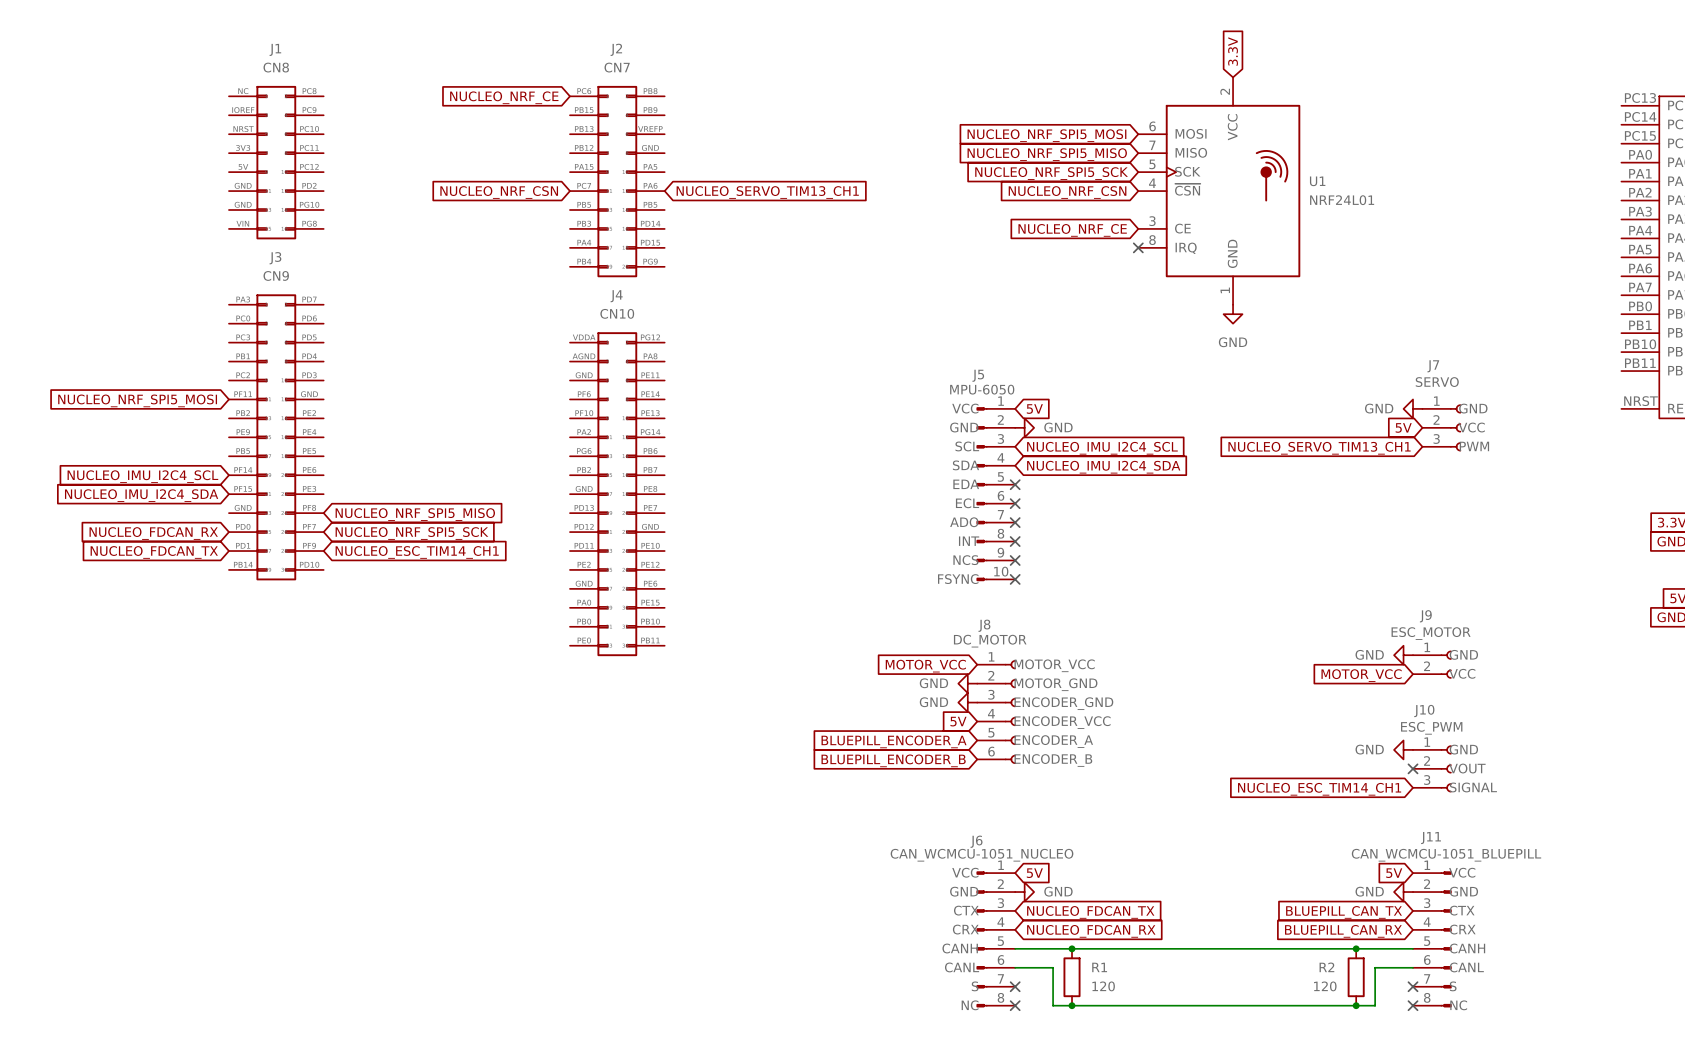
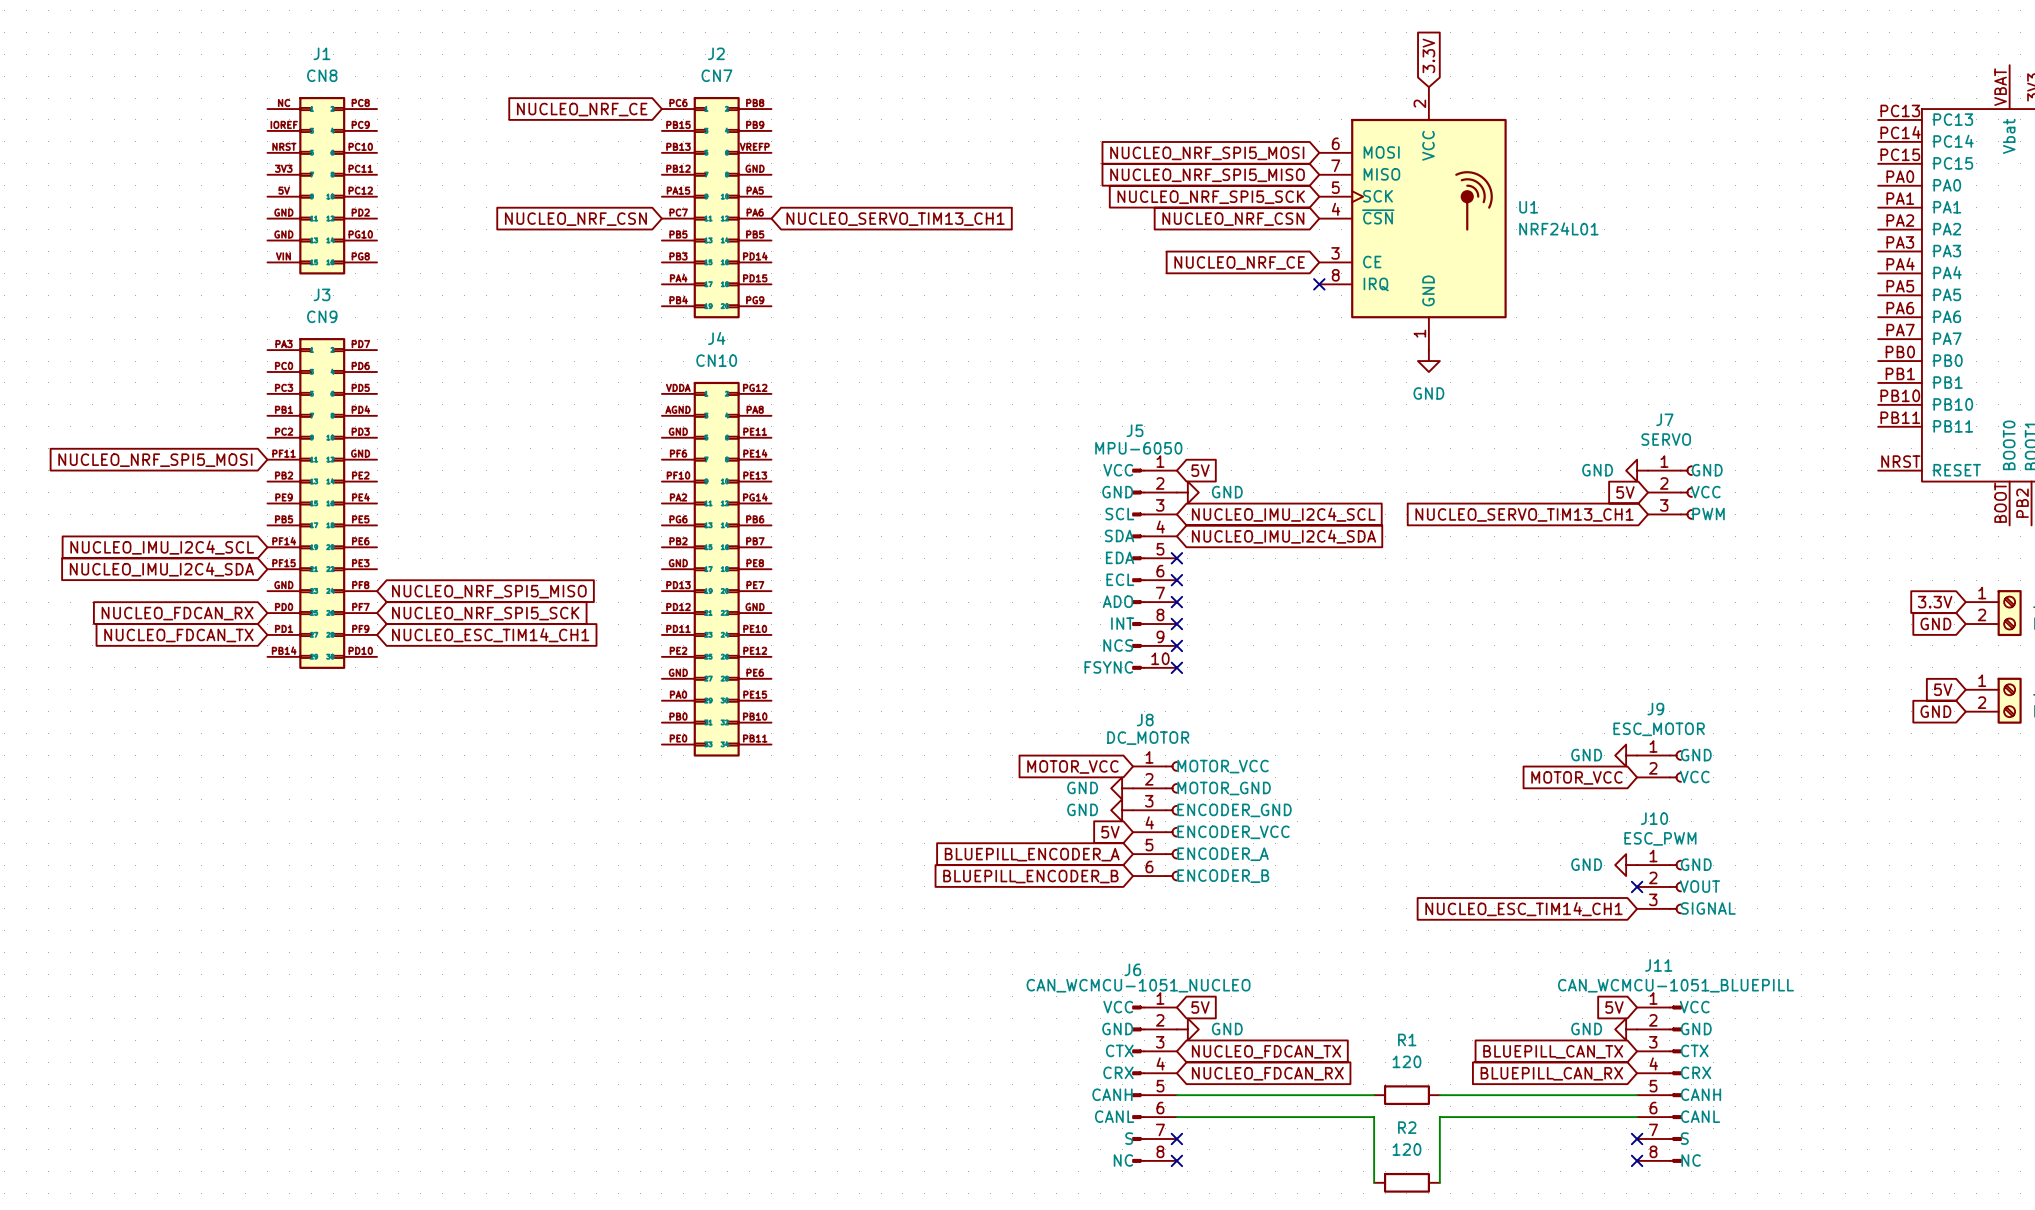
junction: (1072, 948) -> none
wire: (1185, 948) (1242, 948) -> none
junction: (1356, 948) -> none
wire: (1053, 967) (1053, 1005) (1375, 1005) (1375, 967) -> (1220, 1117) (1374, 1117) (1374, 1182)
R1 name position: R1 (1099, 967) -> R1 (1407, 1039)
R2 name position: R2 (1326, 967) -> R2 (1407, 1127)
wire: none -> (1593, 1117) (1439, 1117) (1439, 1182)
R1 rotation: 0° (1072, 977) -> 90° clockwise (1406, 1095)
R1 position: (1072, 977) -> (1406, 1095)
R2 rotation: 0° (1356, 977) -> 90° clockwise (1406, 1182)
R2 position: (1356, 977) -> (1406, 1182)
R1 value position: 120 (1103, 986) -> 120 (1406, 1061)
junction: (1072, 1005) -> none
junction: (1356, 1005) -> none

